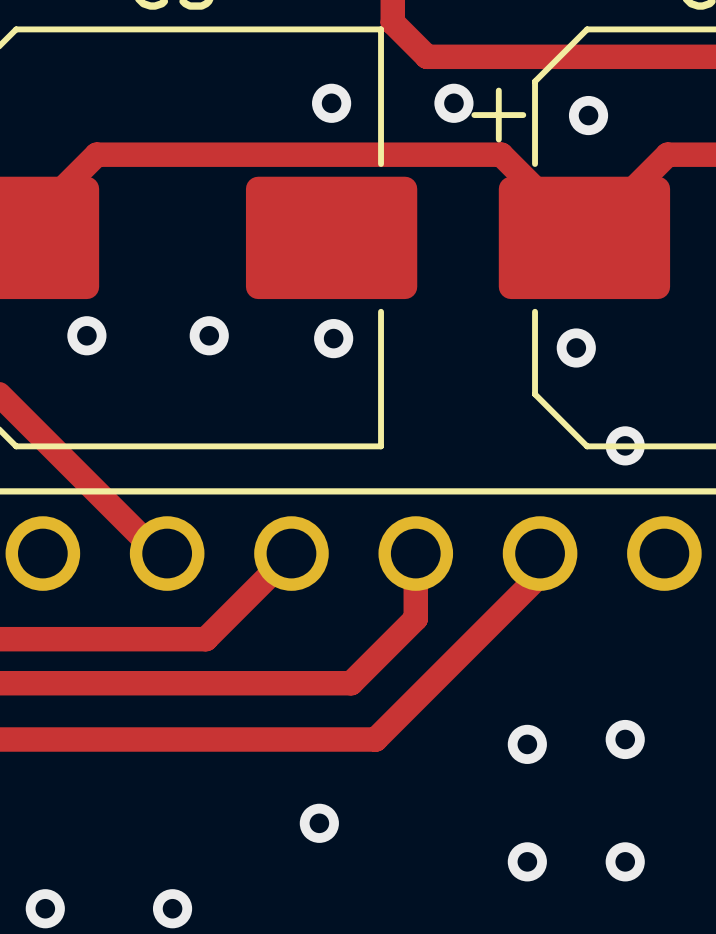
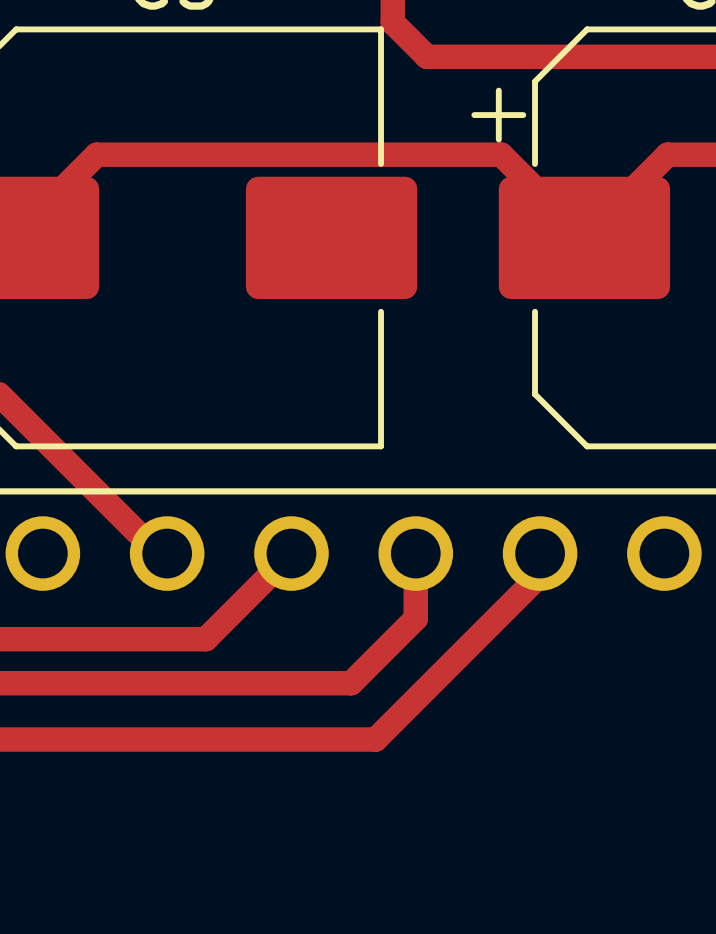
via: (331, 103) -> none
via: (453, 103) -> none
via: (588, 115) -> none
via: (86, 335) -> none
via: (209, 335) -> none
via: (333, 338) -> none
via: (576, 348) -> none
via: (625, 445) -> none
via: (625, 739) -> none
via: (527, 744) -> none
via: (319, 823) -> none
via: (527, 861) -> none
via: (625, 861) -> none
via: (45, 908) -> none
via: (172, 908) -> none

